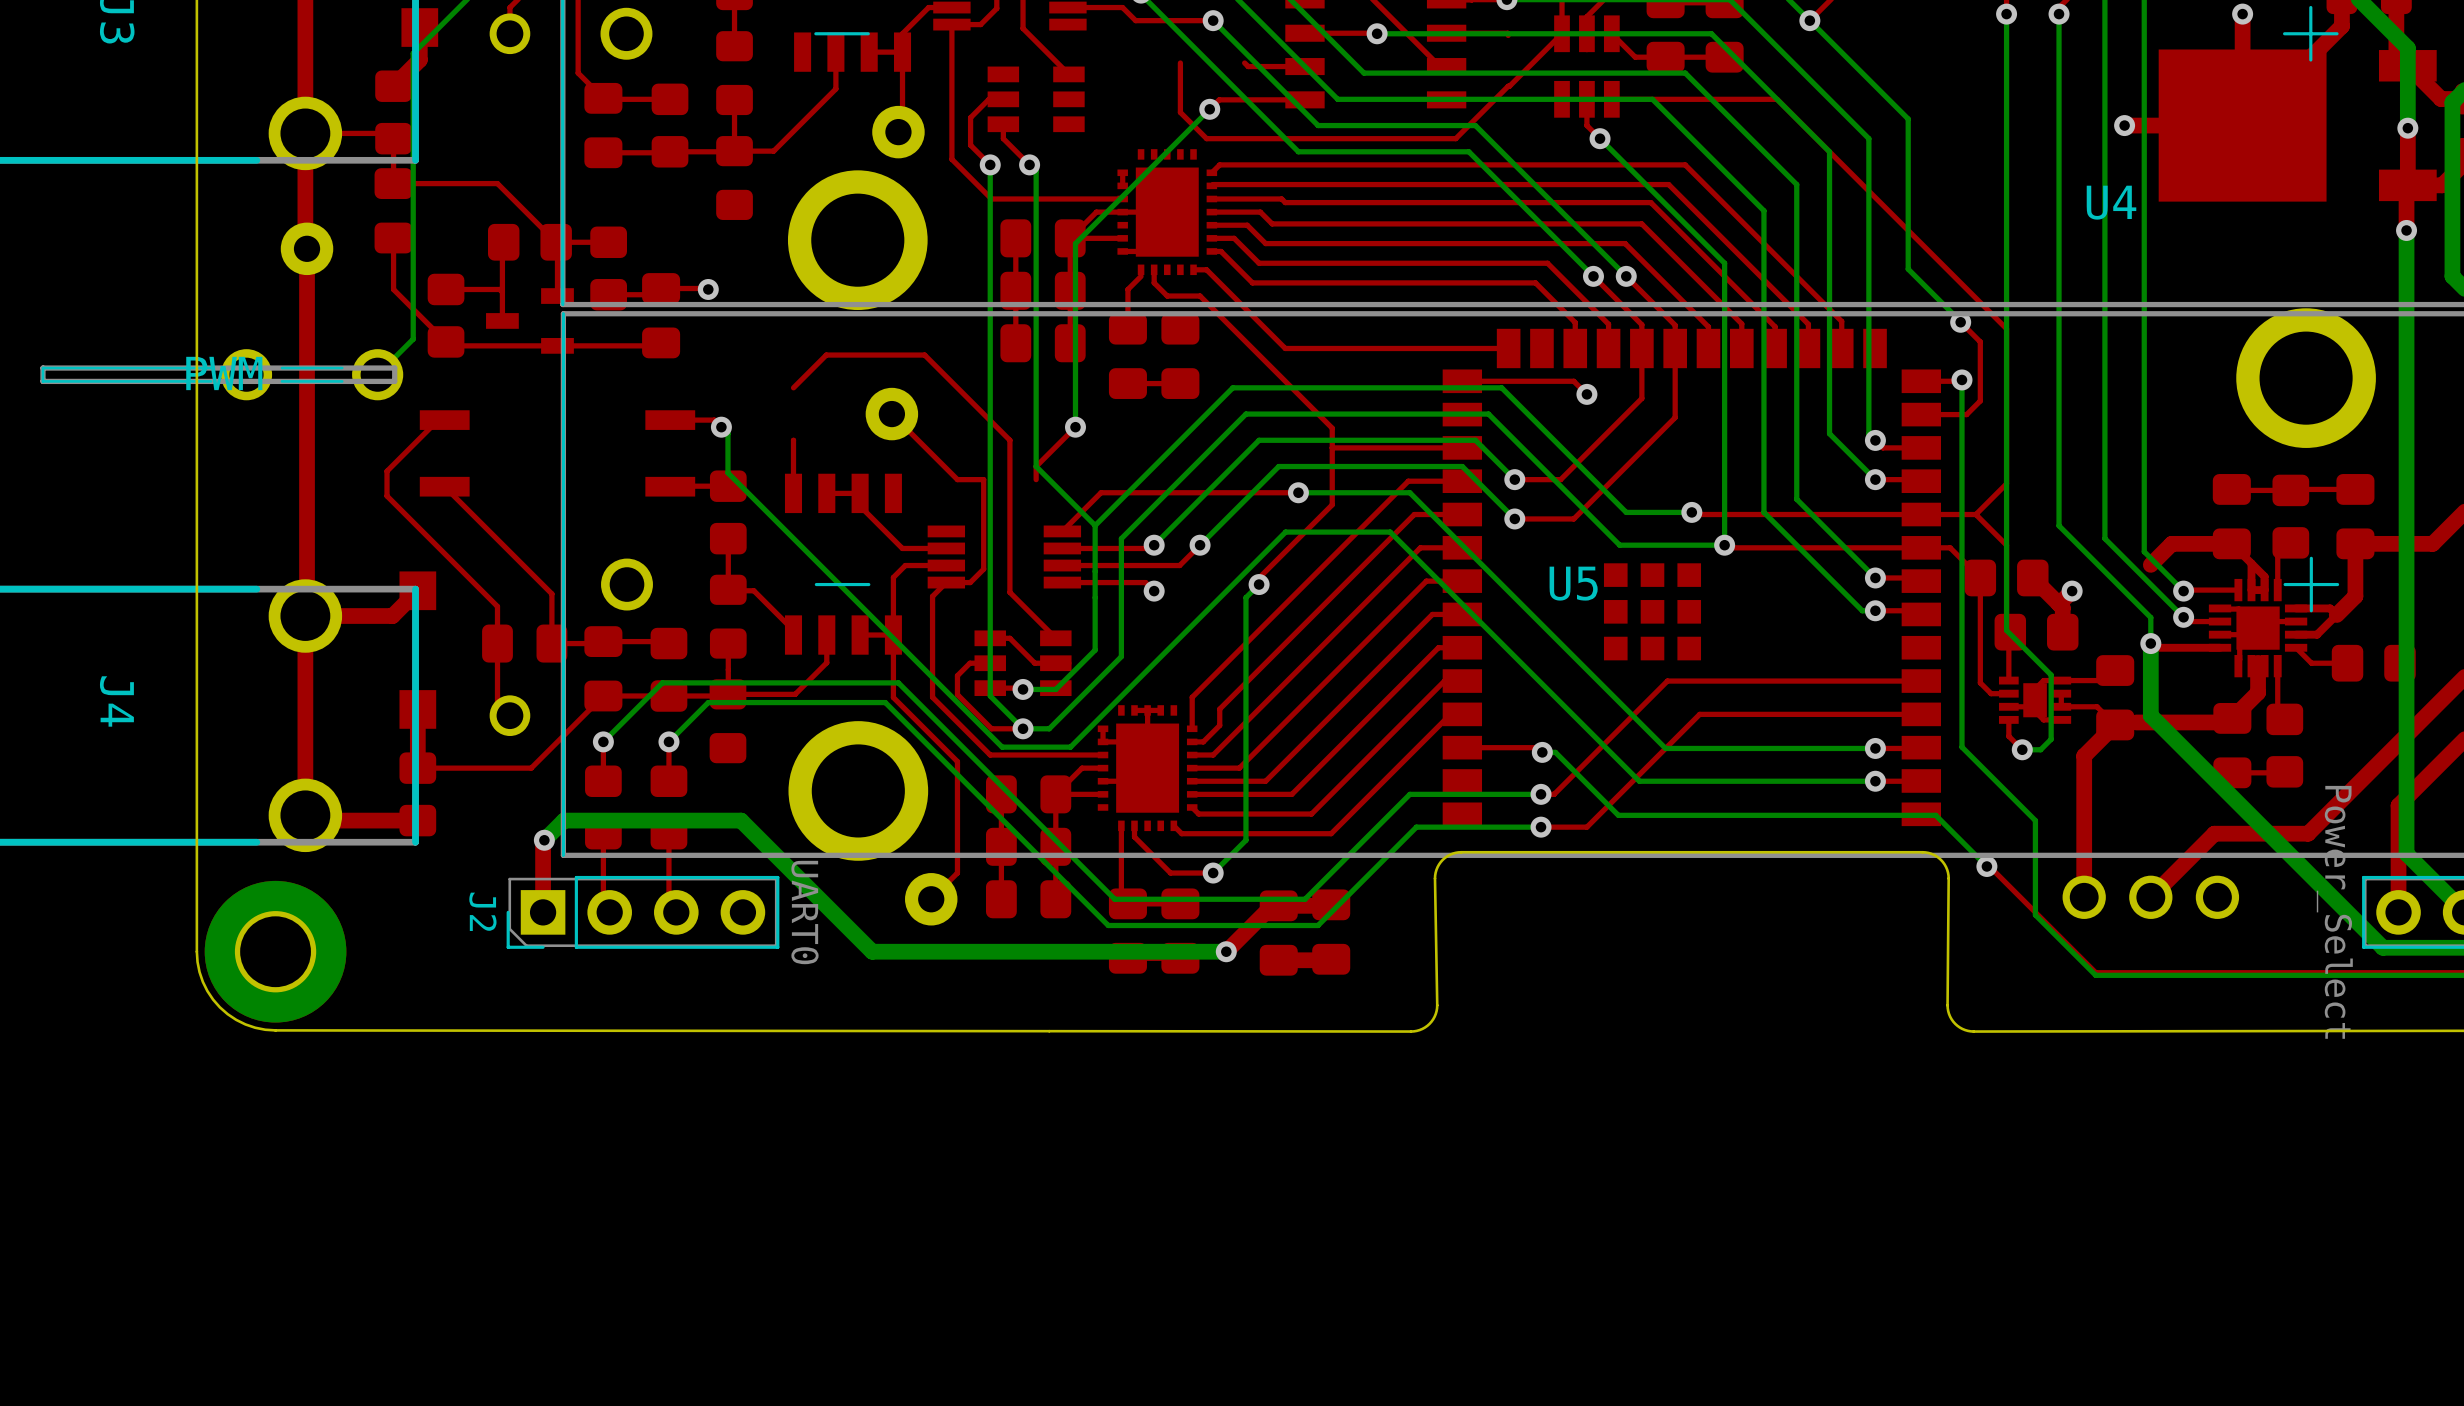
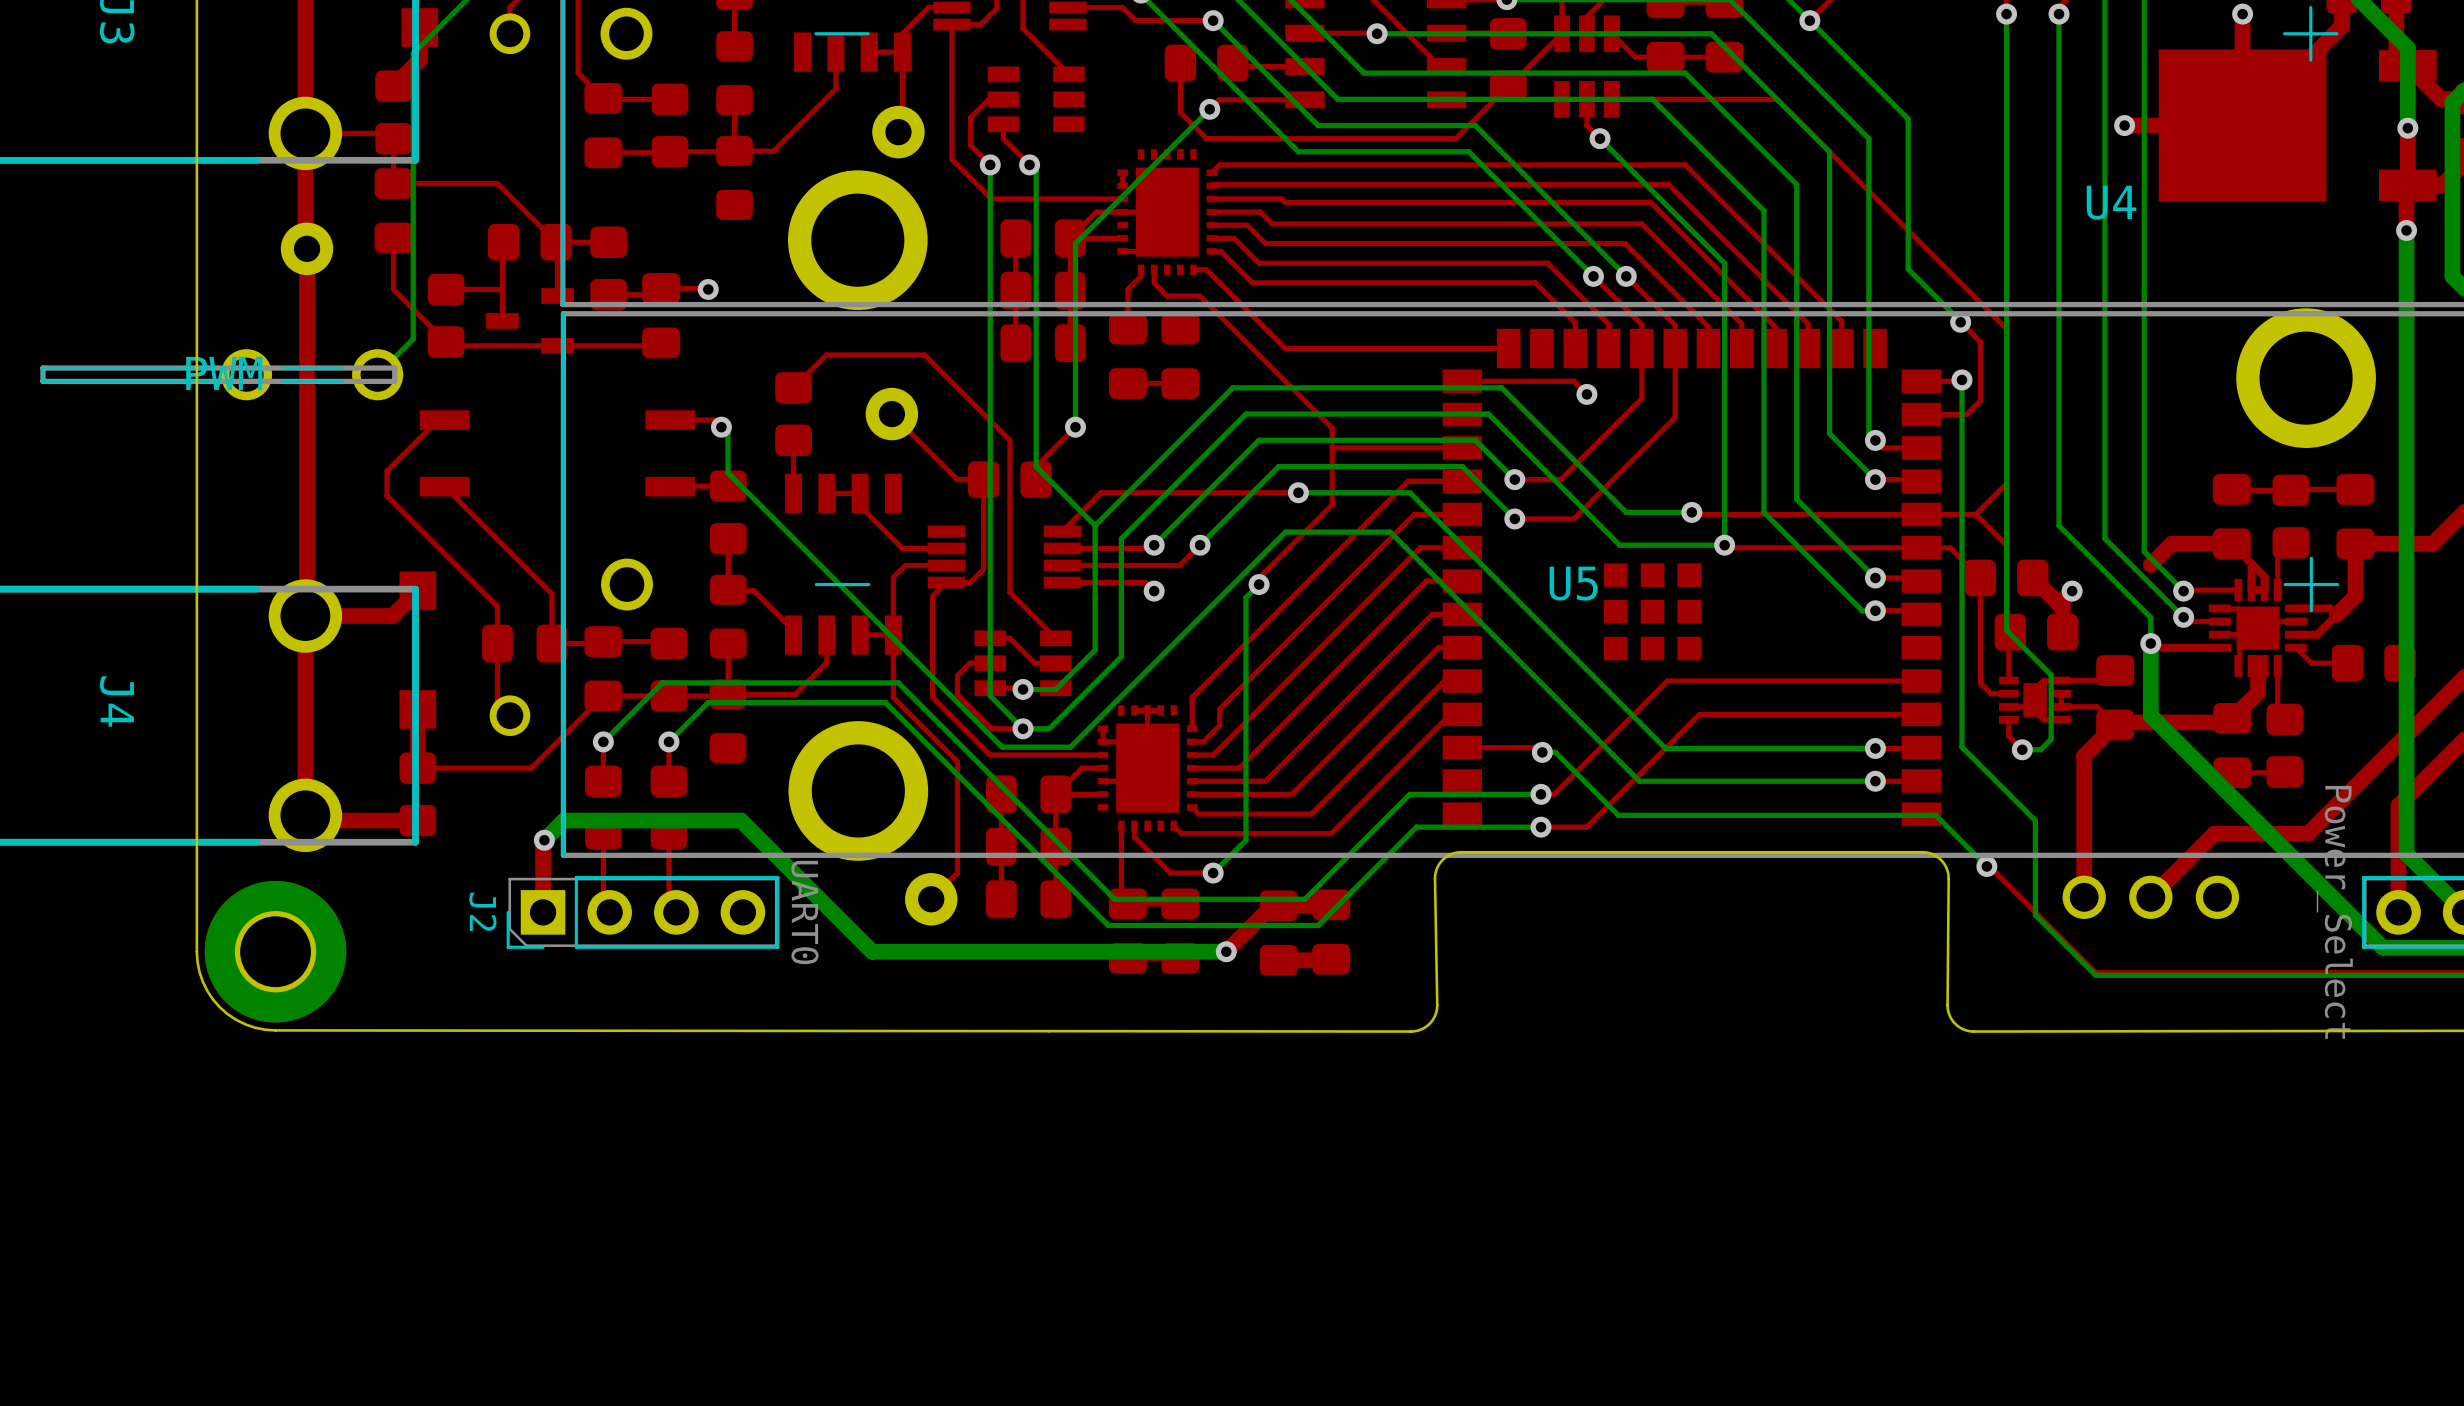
part: none -> (1508, 59)
part: none -> (1206, 63)
part: none -> (793, 414)
part: none -> (1009, 479)

